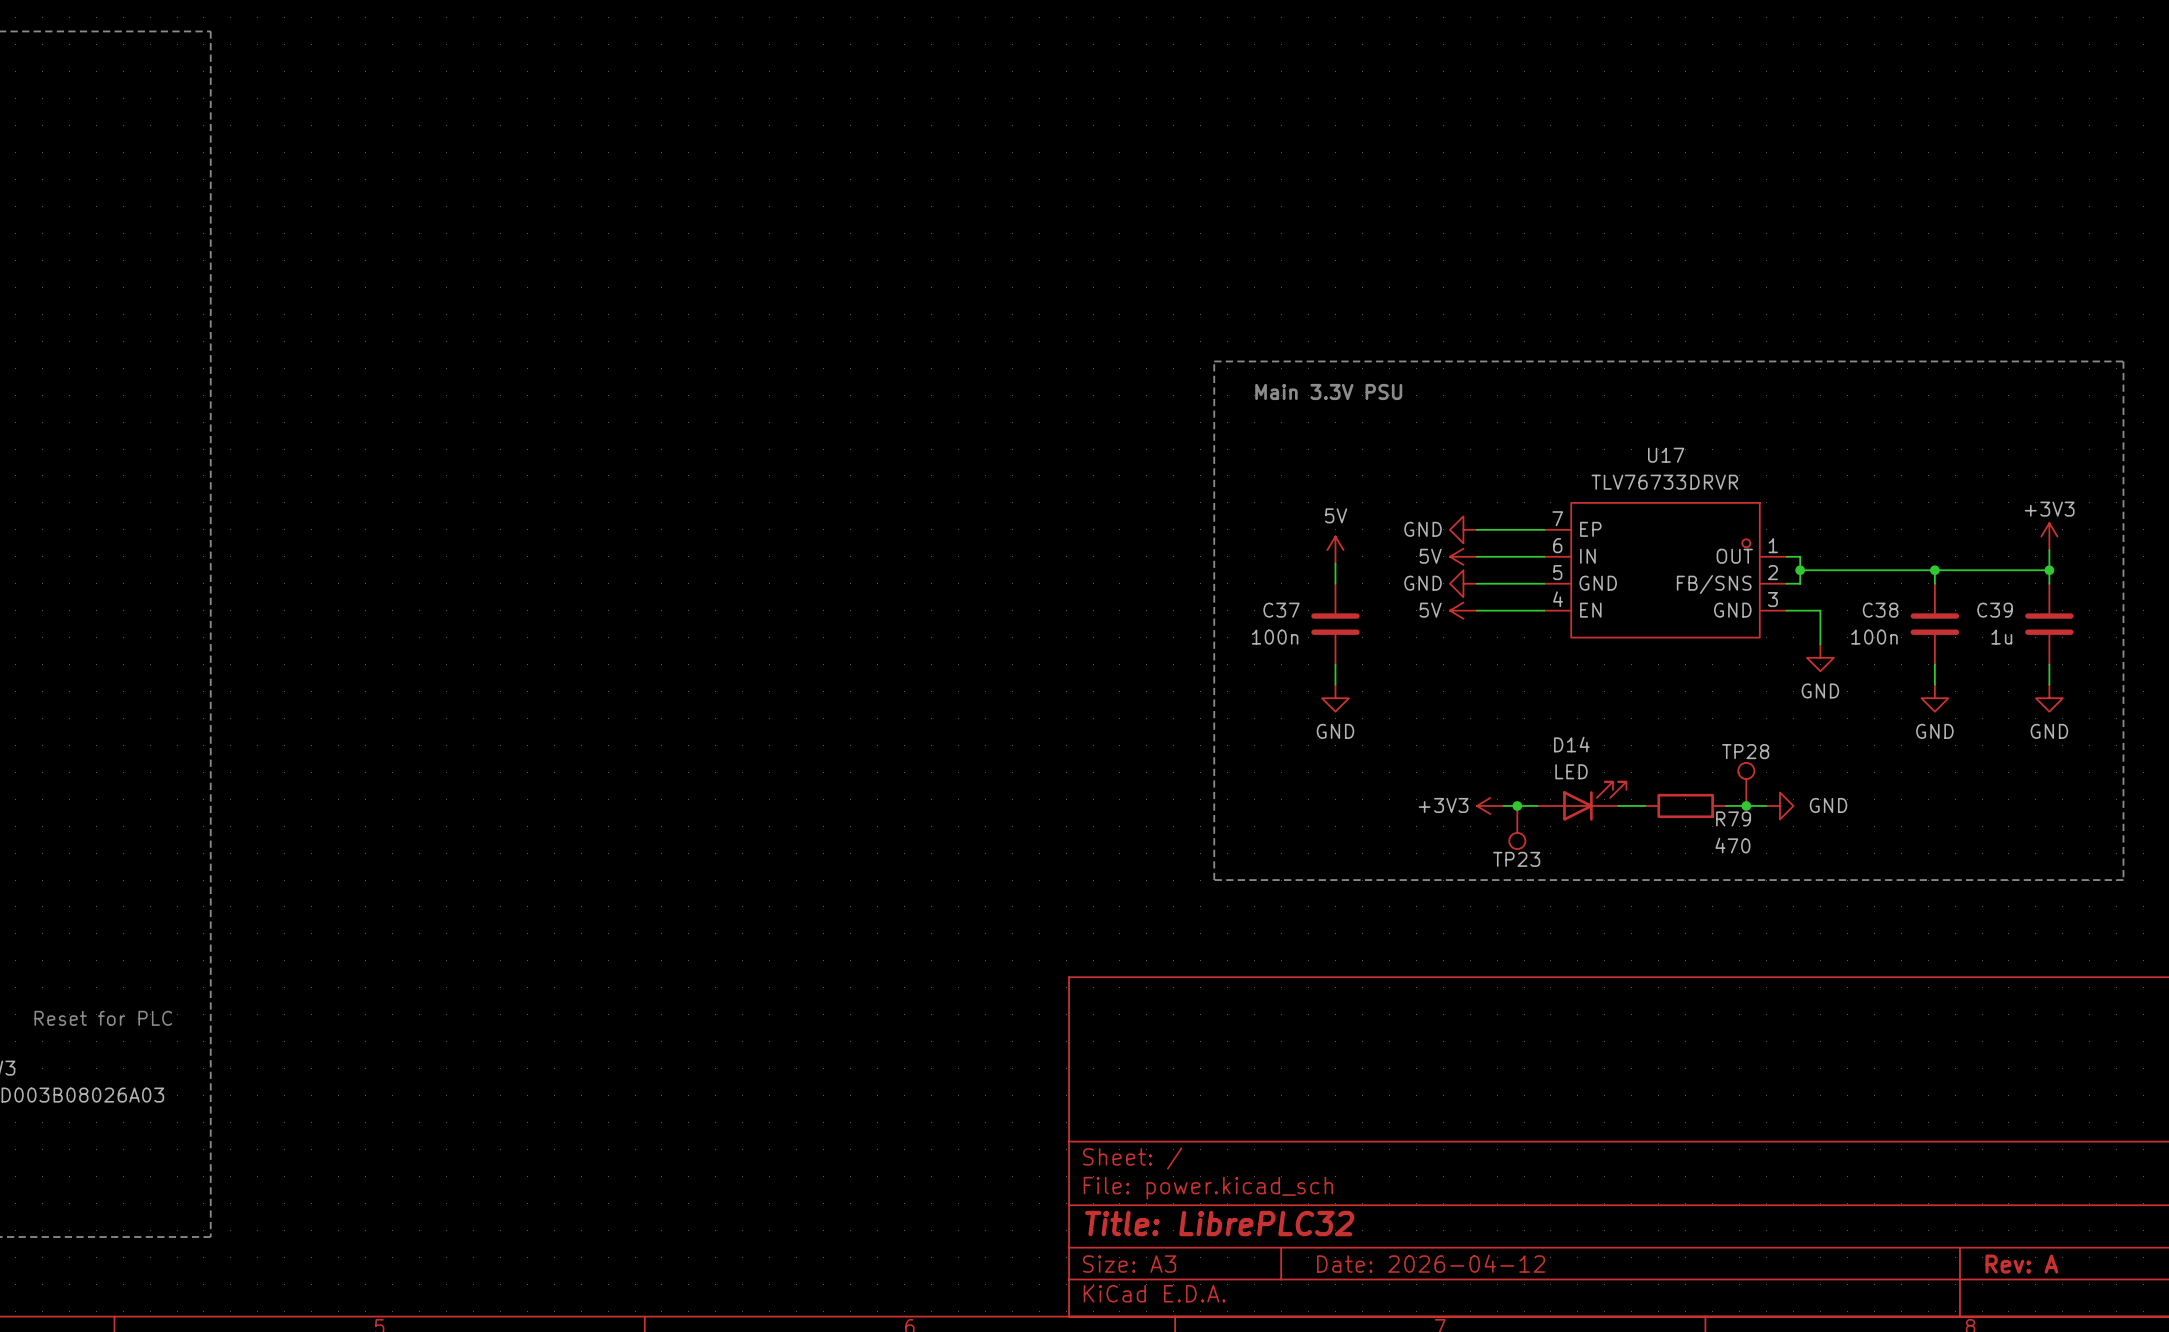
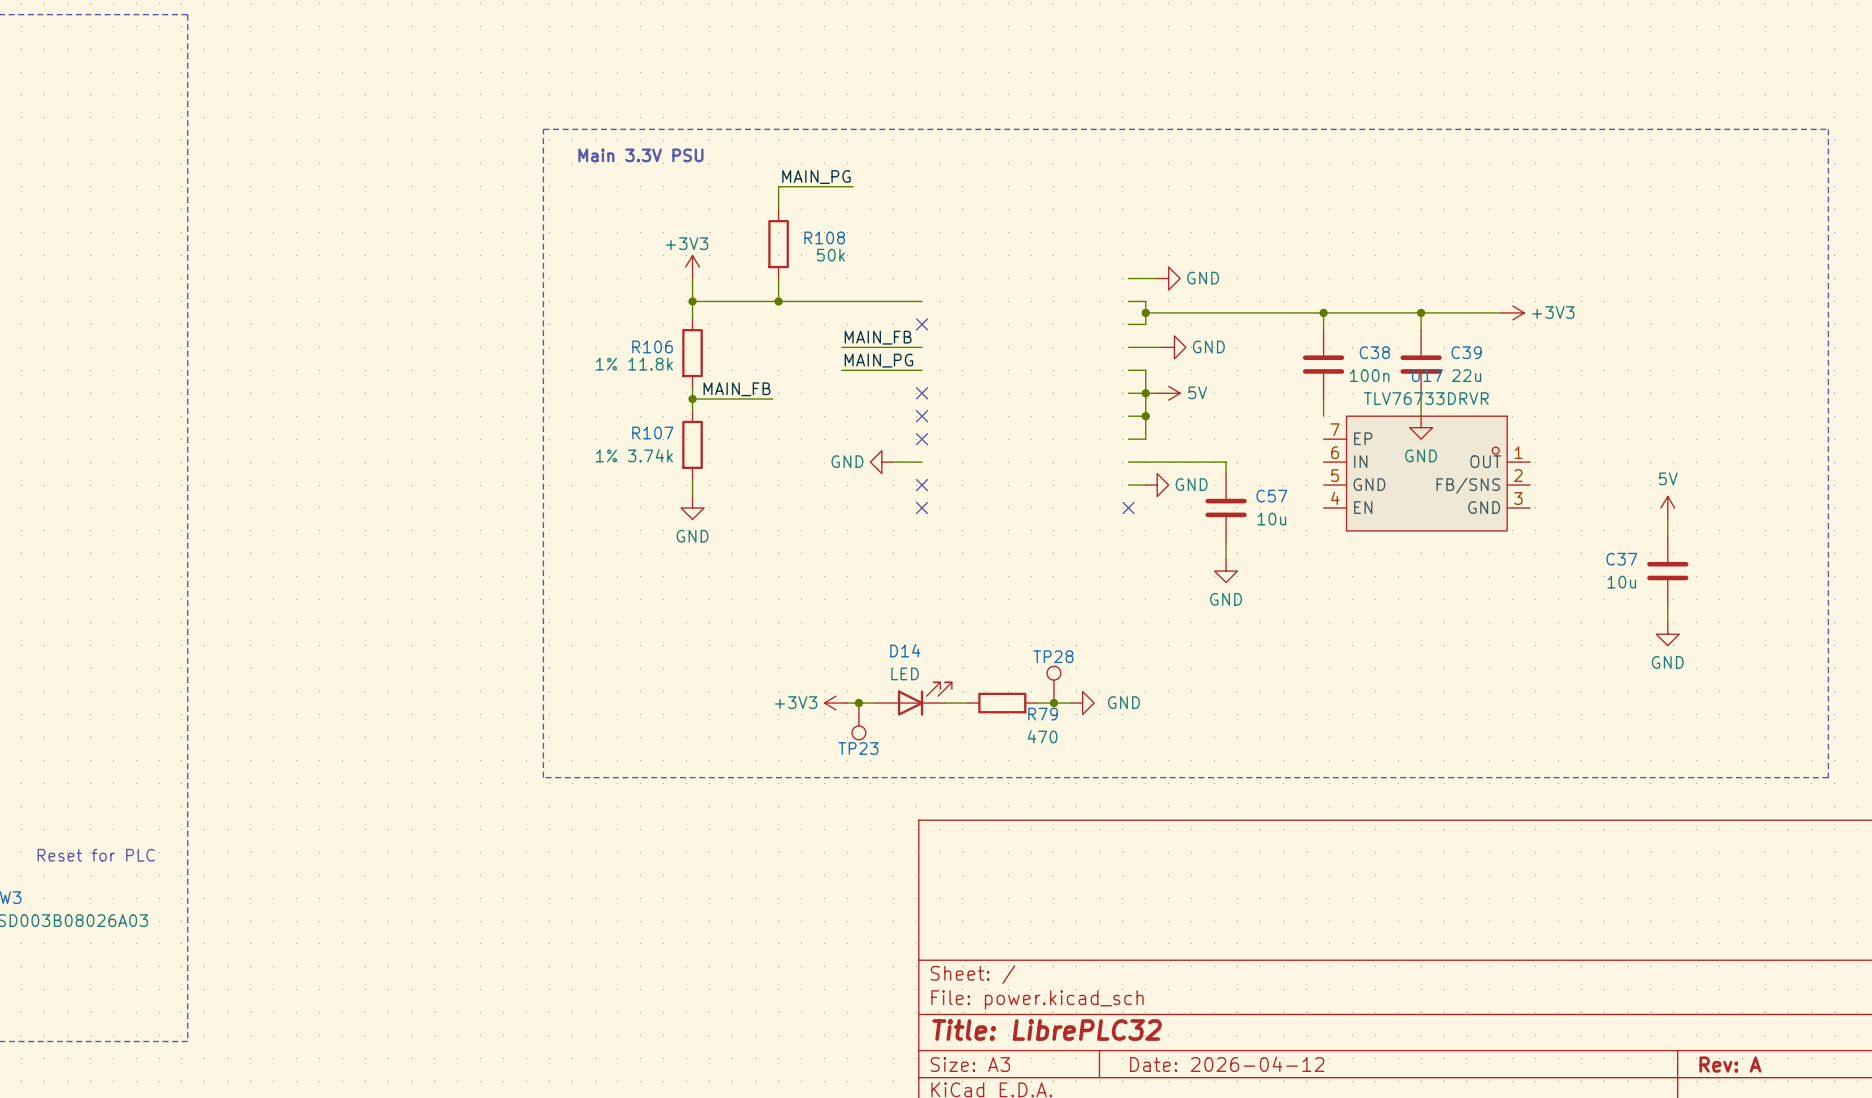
line: none -> (543, 129) (1828, 129) (1828, 777) (543, 777) (543, 129)
text: none -> Main 3.3V PSU (640, 155)
label: none -> MAIN_PG (816, 177)
wire: none -> (853, 186) (778, 186) (778, 209)
R108: none -> 50k (778, 244)
power symbol: none -> +3V3 (692, 267)
wire: none -> (692, 278) (692, 318)
wire: none -> (778, 278) (778, 301)
wire: none -> (1128, 278) (1157, 278)
power symbol: none -> GND (1168, 278)
line: (1214, 361) (2123, 361) (2123, 880) (1214, 880) (1214, 361) -> none
wire: none -> (692, 301) (922, 301)
junction: none -> (692, 301)
junction: none -> (778, 301)
wire: none -> (1128, 301) (1145, 301) (1145, 324) (1128, 324)
wire: none -> (1145, 312) (1501, 312)
junction: none -> (1145, 312)
wire: none -> (1323, 312) (1323, 330)
junction: none -> (1323, 312)
wire: none -> (1421, 312) (1421, 330)
junction: none -> (1421, 312)
power symbol: none -> +3V3 (1512, 312)
text: Main 3.3V PSU (1328, 391) -> none
no-connect mark: none -> (922, 324)
label: none -> MAIN_FB (878, 337)
wire: none -> (841, 347) (922, 347)
wire: none -> (1128, 347) (1162, 347)
power symbol: none -> GND (1174, 347)
R106: none -> 11.8k (692, 353)
label: none -> MAIN_PG (878, 360)
wire: none -> (841, 370) (922, 370)
wire: none -> (1128, 370) (1145, 370) (1145, 439) (1128, 439)
wire: none -> (692, 387) (692, 410)
label: none -> MAIN_FB (736, 389)
no-connect mark: none -> (922, 393)
wire: none -> (1128, 393) (1157, 393)
junction: none -> (1145, 393)
power symbol: none -> 5V (1168, 393)
wire: none -> (692, 398) (772, 398)
junction: none -> (692, 398)
wire: none -> (1323, 398) (1323, 416)
wire: none -> (1421, 398) (1421, 416)
no-connect mark: none -> (922, 416)
wire: none -> (1128, 416) (1145, 416)
junction: none -> (1145, 416)
power symbol: none -> GND (1421, 427)
no-connect mark: none -> (922, 439)
power symbol: GND (1463, 529) -> none
wire: (1476, 529) (1544, 529) -> none
R107: none -> 3.74k (692, 444)
power symbol: +3V3 (2049, 536) -> none
power symbol: 5V (1335, 550) -> none
wire: (2049, 550) (2049, 583) -> none
power symbol: none -> GND (881, 462)
wire: none -> (893, 462) (922, 462)
wire: none -> (1128, 462) (1226, 462) (1226, 473)
power symbol: 5V (1463, 556) -> none
wire: (1476, 556) (1544, 556) -> none
wire: (1786, 556) (1800, 556) (1800, 583) (1786, 583) -> none
wire: (1335, 563) (1335, 583) -> (1128, 485) (1145, 485)
wire: (1800, 570) (2049, 570) -> none
junction: (1800, 570) -> none
wire: (1934, 570) (1934, 583) -> none
junction: (1934, 570) -> none
junction: (2049, 570) -> none
wire: none -> (692, 479) (692, 496)
no-connect mark: none -> (922, 485)
power symbol: none -> GND (1157, 485)
power symbol: GND (1463, 583) -> none
wire: (1476, 583) (1544, 583) -> none
power symbol: none -> GND (692, 507)
no-connect mark: none -> (922, 507)
no-connect mark: none -> (1128, 507)
C57: none -> 10u (1226, 507)
power symbol: 5V (1463, 610) -> none
wire: (1476, 610) (1544, 610) -> none
wire: (1786, 610) (1820, 610) (1820, 644) -> none
C38 name position: C38 (1880, 610) -> C38 (1374, 352)
power symbol: none -> 5V (1667, 507)
C39 name position: C39 (1995, 610) -> C39 (1466, 352)
C37 position: (1335, 624) -> (1667, 571)
C38 position: (1934, 624) -> (1323, 364)
C39 position: (2049, 624) -> (1421, 364)
C37 value: 100n (1275, 637) -> 10u (1621, 582)
C38 value position: 100n (1874, 637) -> 100n (1369, 375)
C39 value: 1u (2001, 637) -> 22u (1466, 375)
power symbol: GND (1820, 657) -> none
wire: (1335, 664) (1335, 684) -> (1226, 542) (1226, 559)
wire: (1934, 664) (1934, 684) -> (1667, 519) (1667, 536)
wire: (2049, 664) (2049, 684) -> (1667, 605) (1667, 622)
power symbol: none -> GND (1226, 571)
power symbol: GND (1335, 698) -> none
power symbol: GND (1934, 698) -> none
power symbol: GND (2049, 698) -> none
power symbol: none -> GND (1667, 634)
TP28 position: (1746, 784) -> (1053, 684)
D14 position: (1581, 801) -> (913, 699)
power symbol: +3V3 (1490, 805) -> none
wire: (1503, 805) (1537, 805) -> none
junction: (1517, 805) -> none
wire: (1618, 805) (1645, 805) -> none
R79 position: (1685, 805) -> (1002, 703)
wire: (1726, 805) (1766, 805) -> none
junction: (1746, 805) -> none
power symbol: GND (1779, 805) -> none
TP23 position: (1517, 827) -> (858, 721)
power symbol: none -> +3V3 (835, 703)
wire: none -> (847, 703) (876, 703)
junction: none -> (858, 703)
wire: none -> (944, 703) (967, 703)
wire: none -> (1036, 703) (1071, 703)
junction: none -> (1053, 703)
power symbol: none -> GND (1082, 703)

